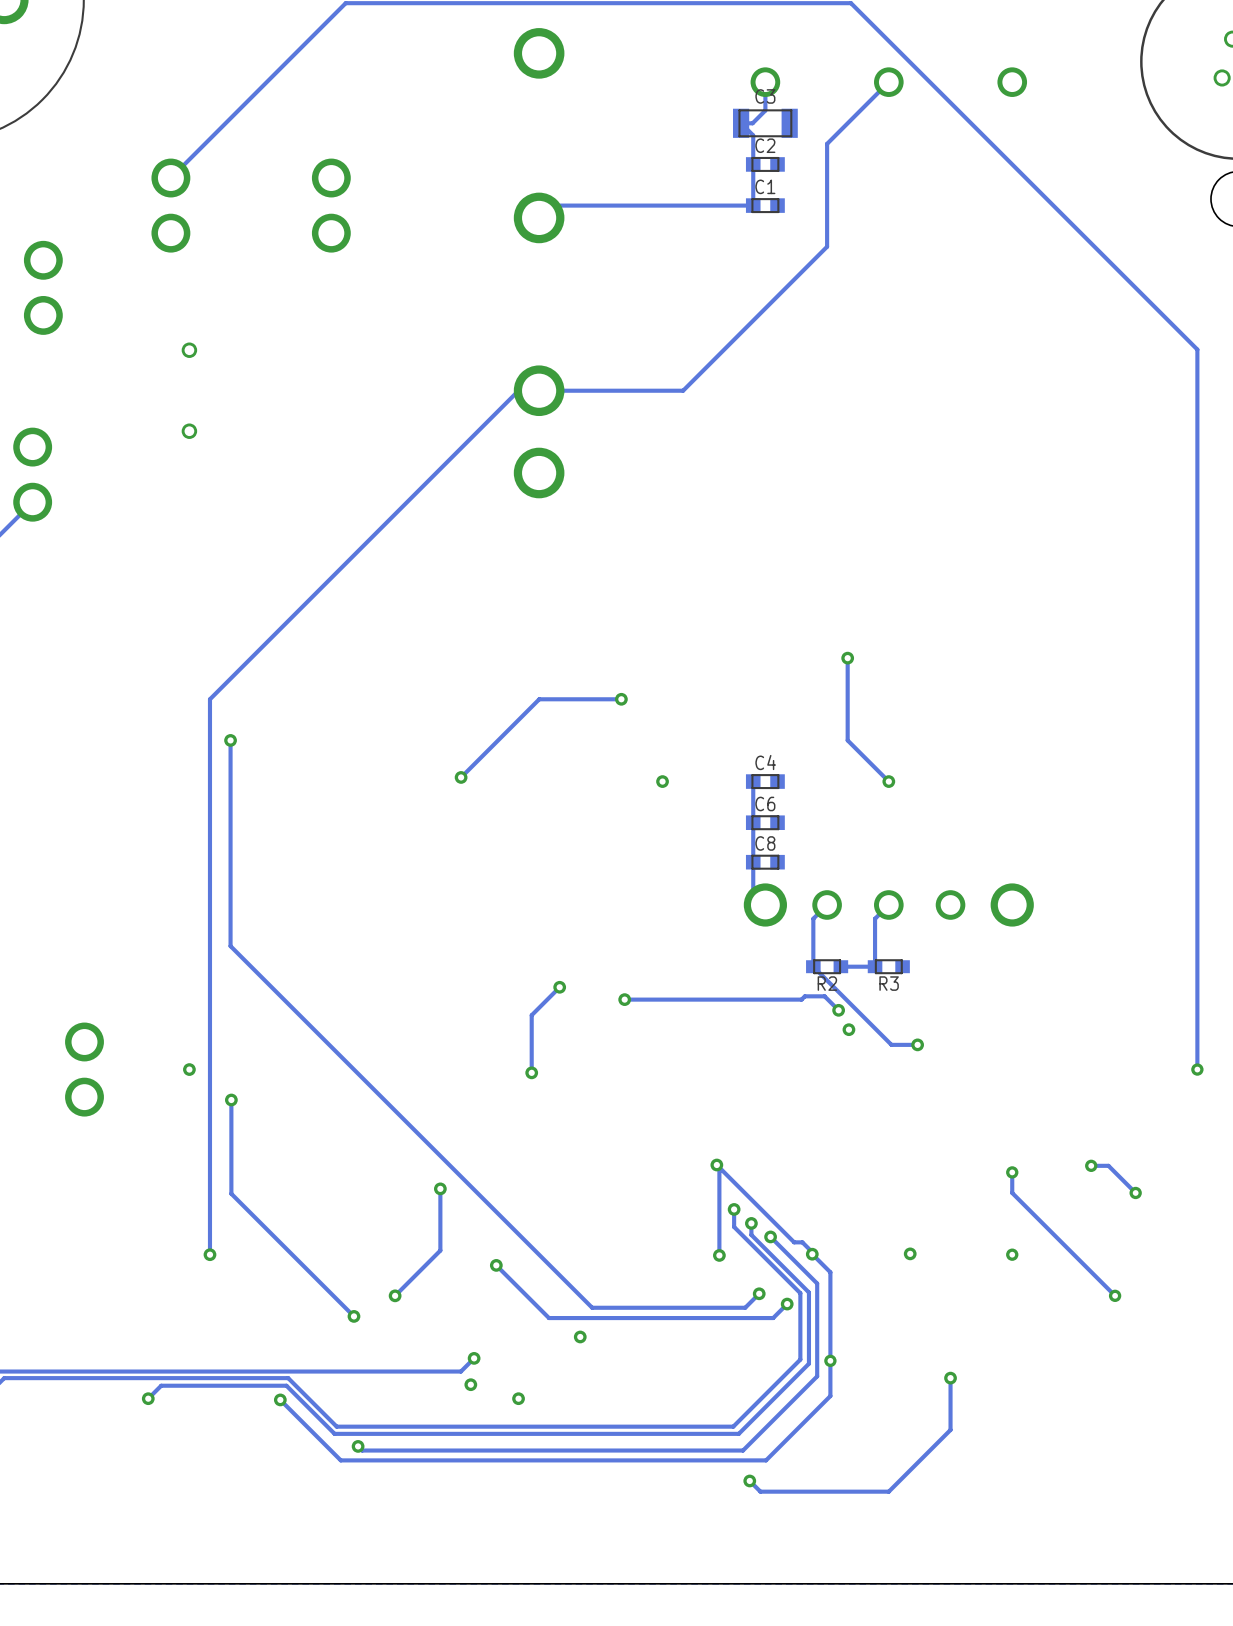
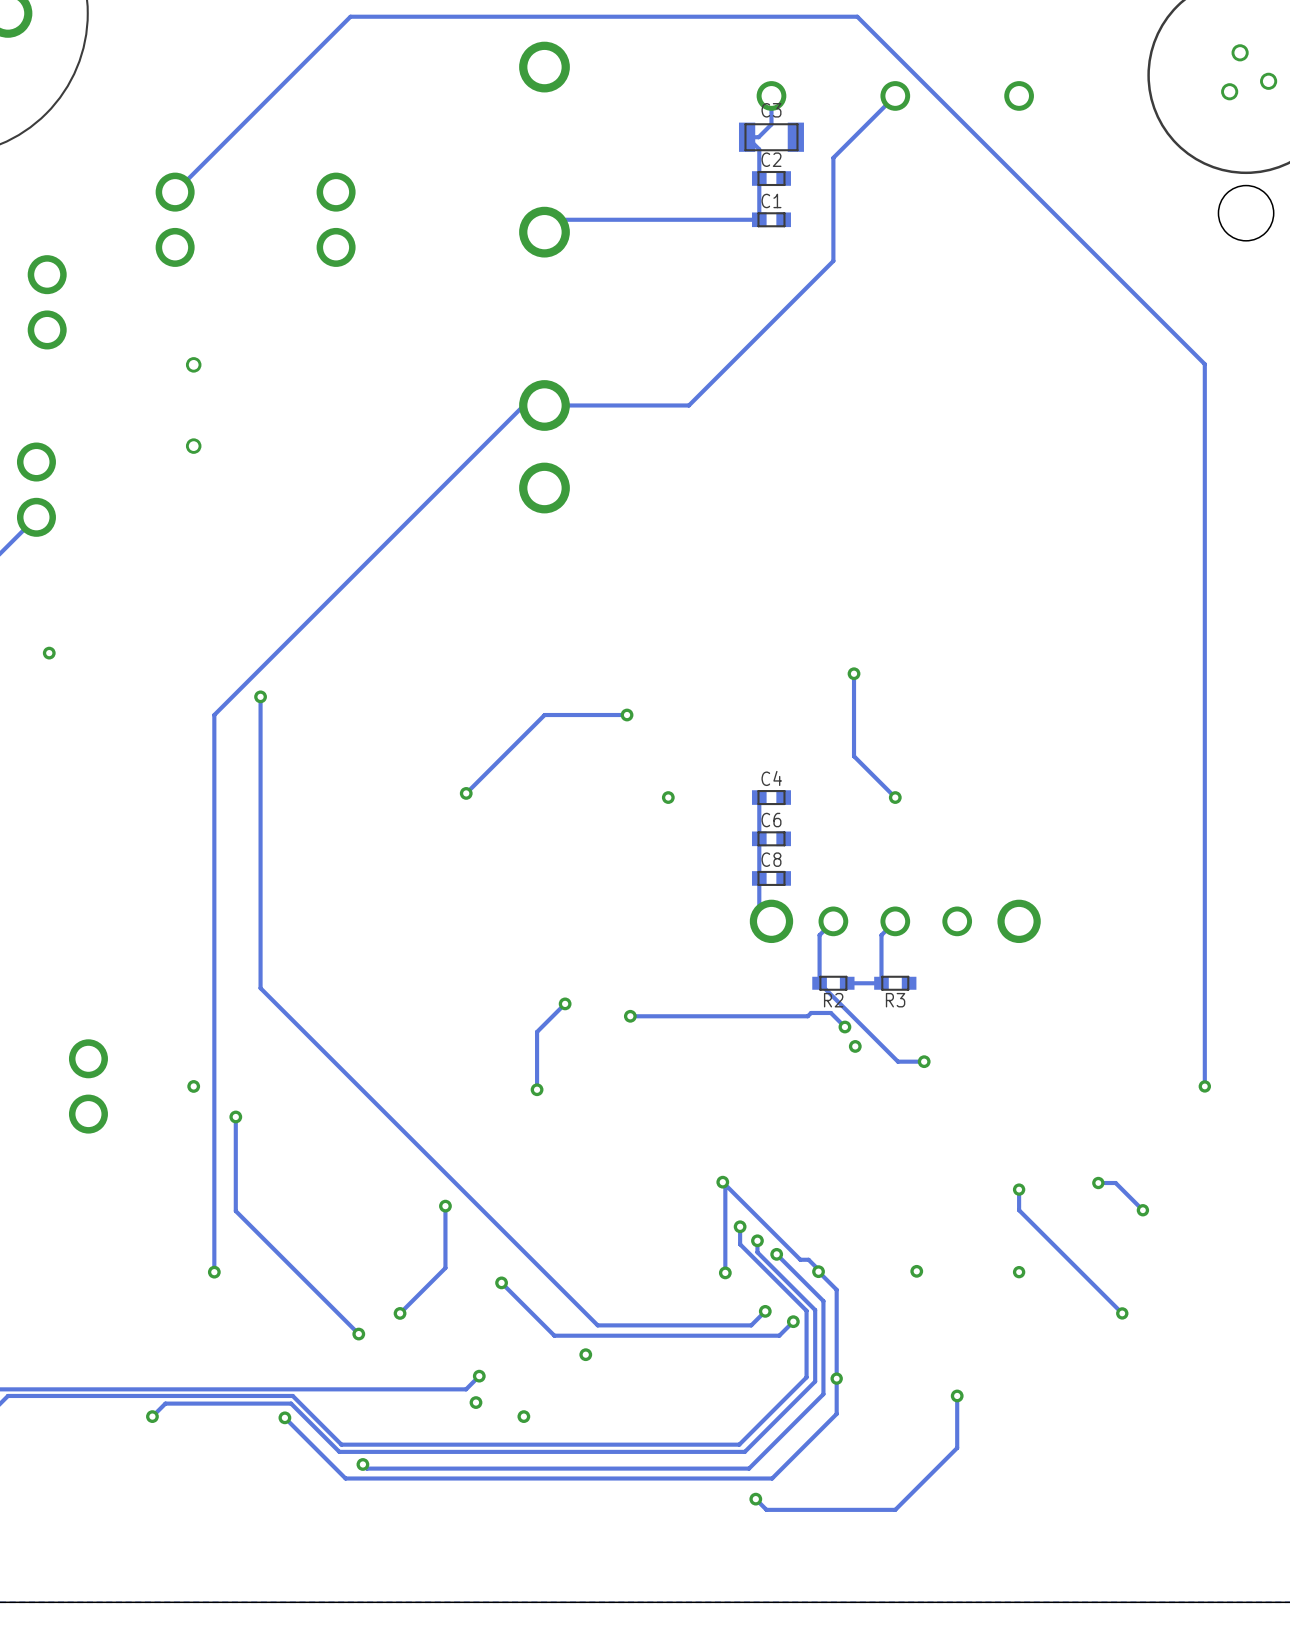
via: none -> (49, 653)
track: (230, 740) (230, 946) (256, 971) -> (260, 696) (260, 988)
via position: (230, 740) -> (260, 696)

